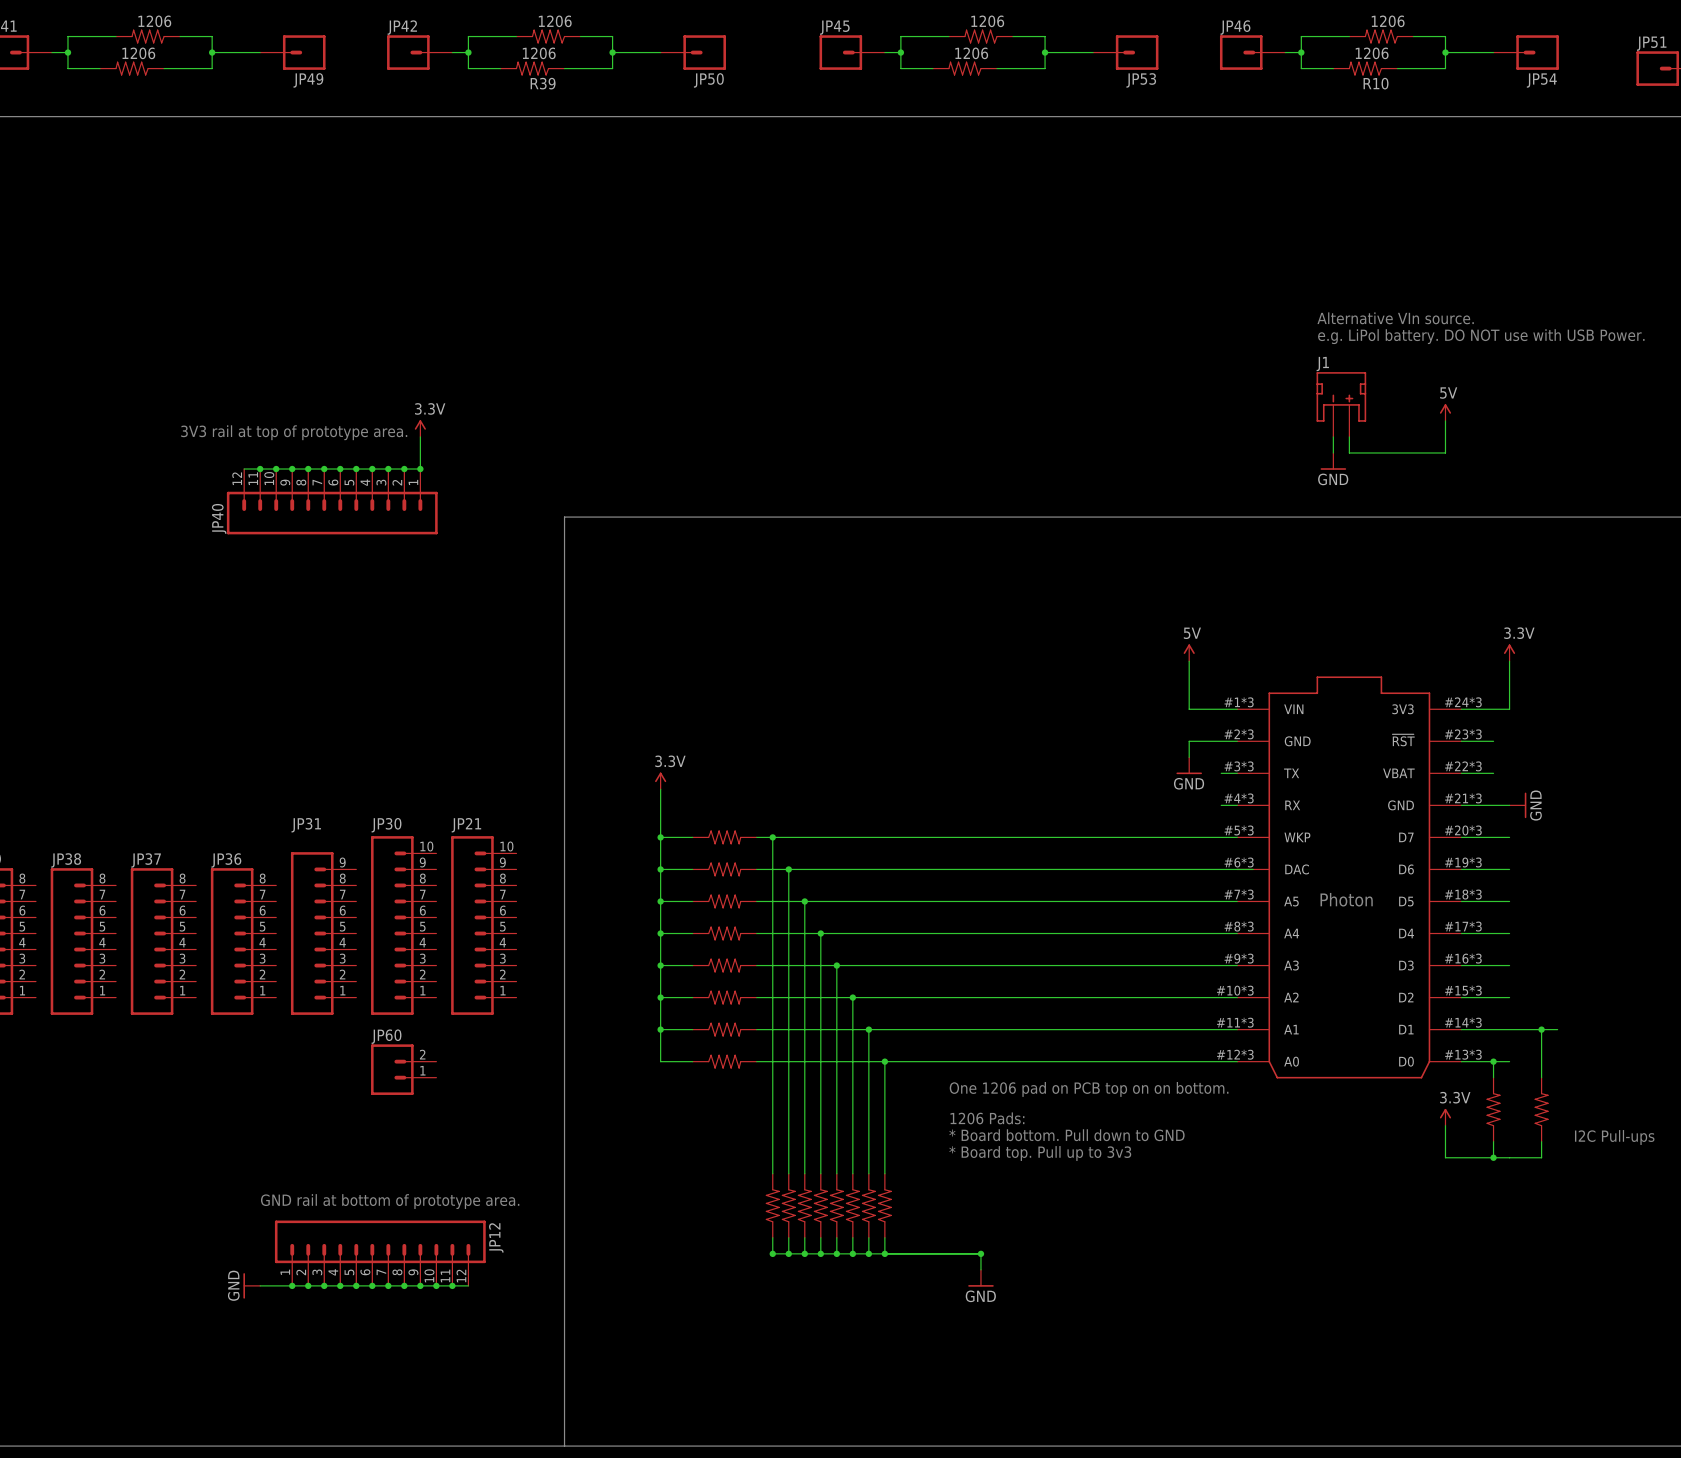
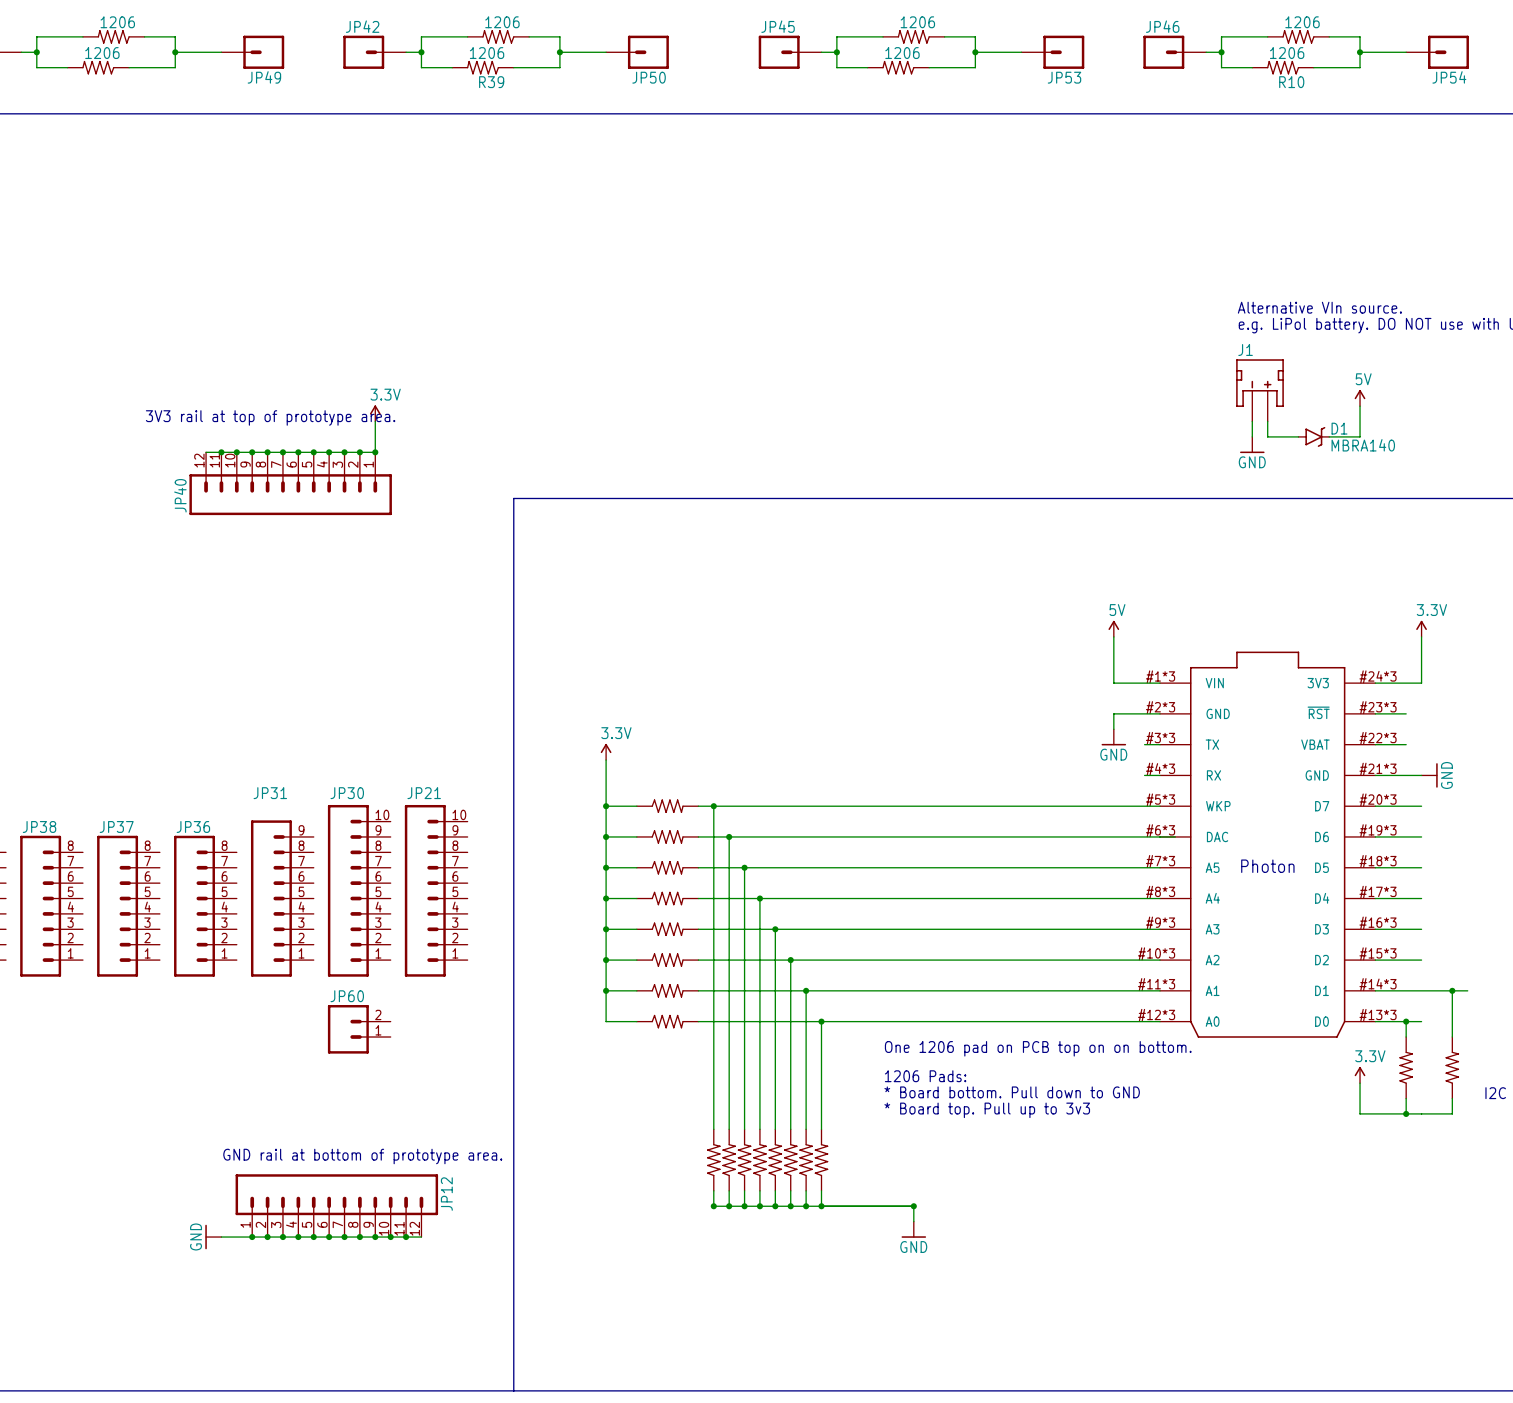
D1: none -> MBRA140 (1313, 436)

